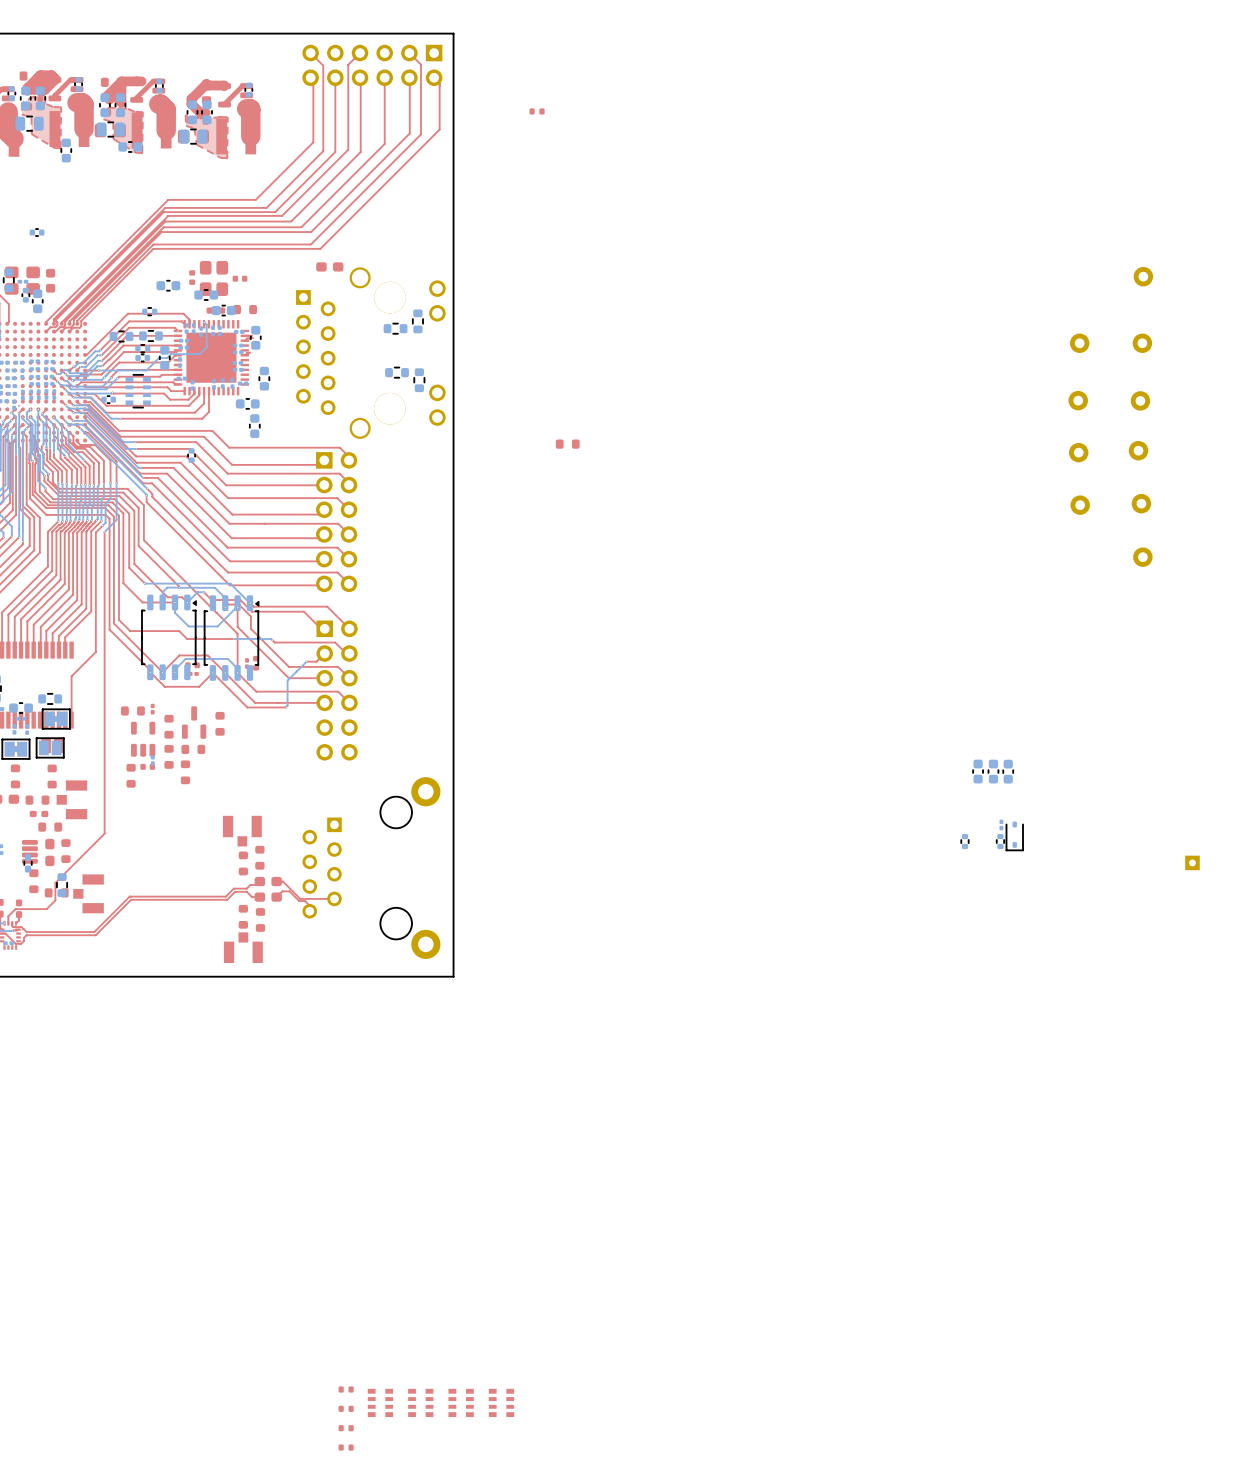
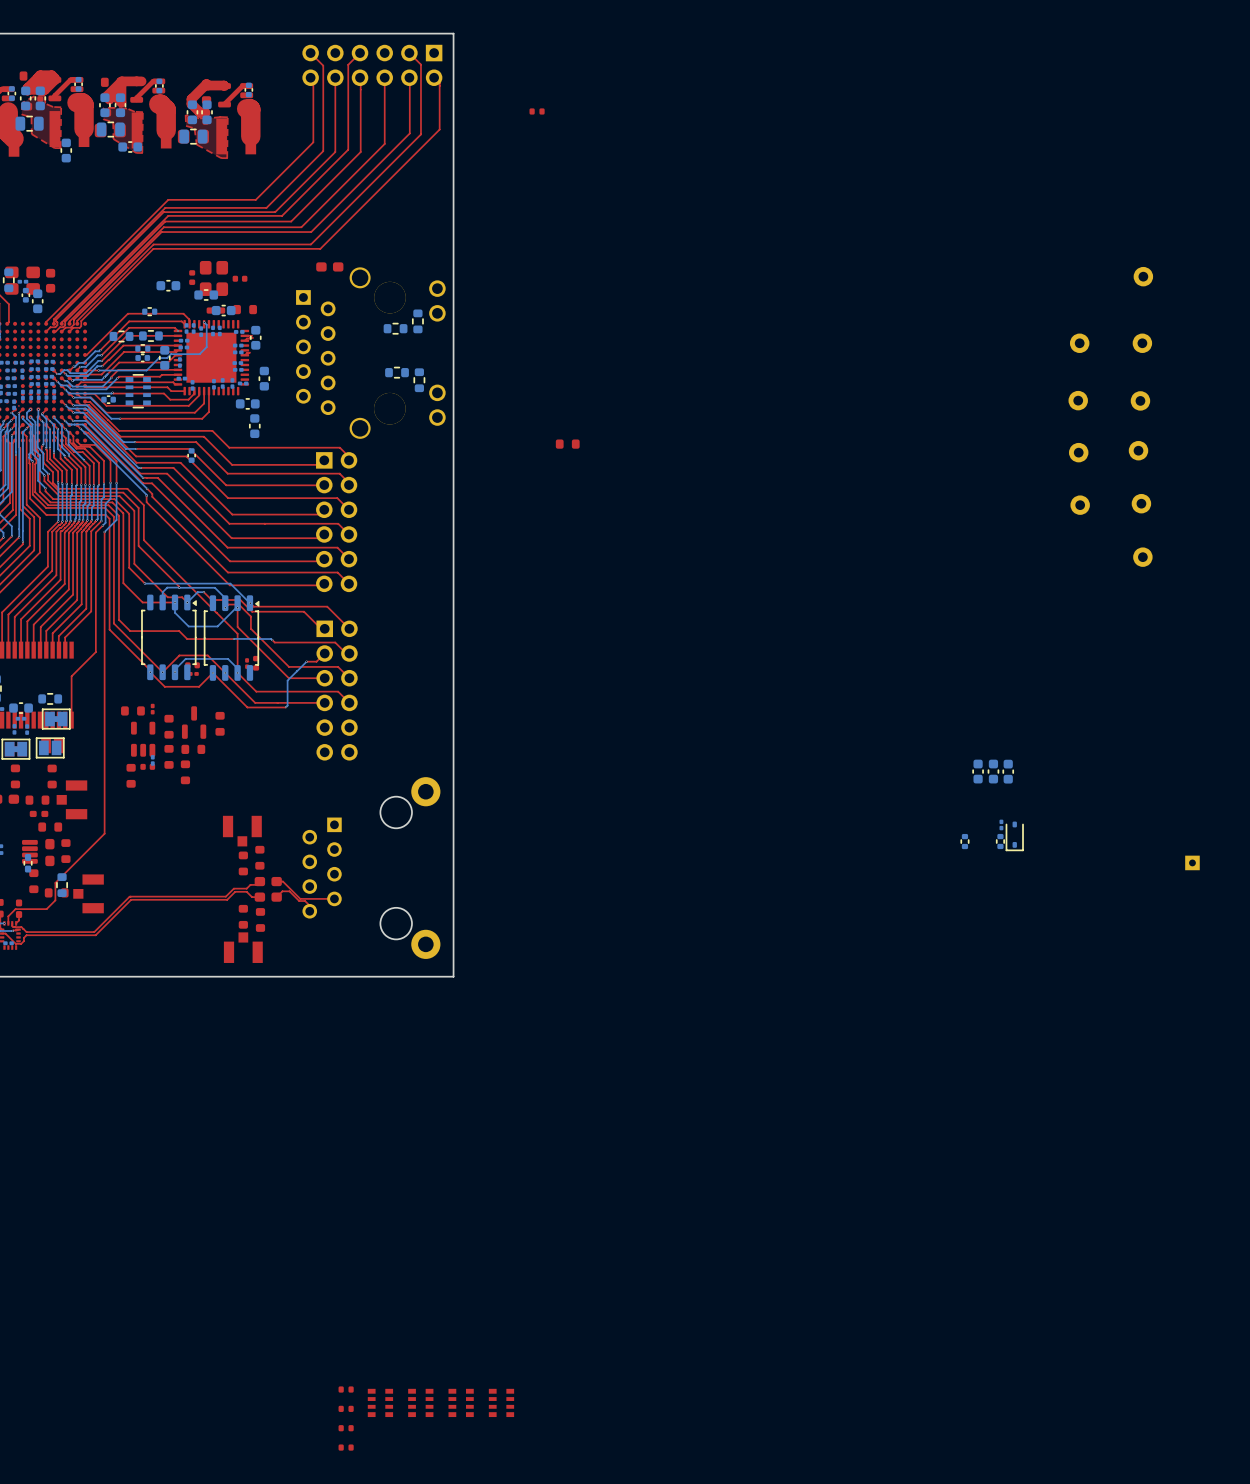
part: (37, 232) -> none

